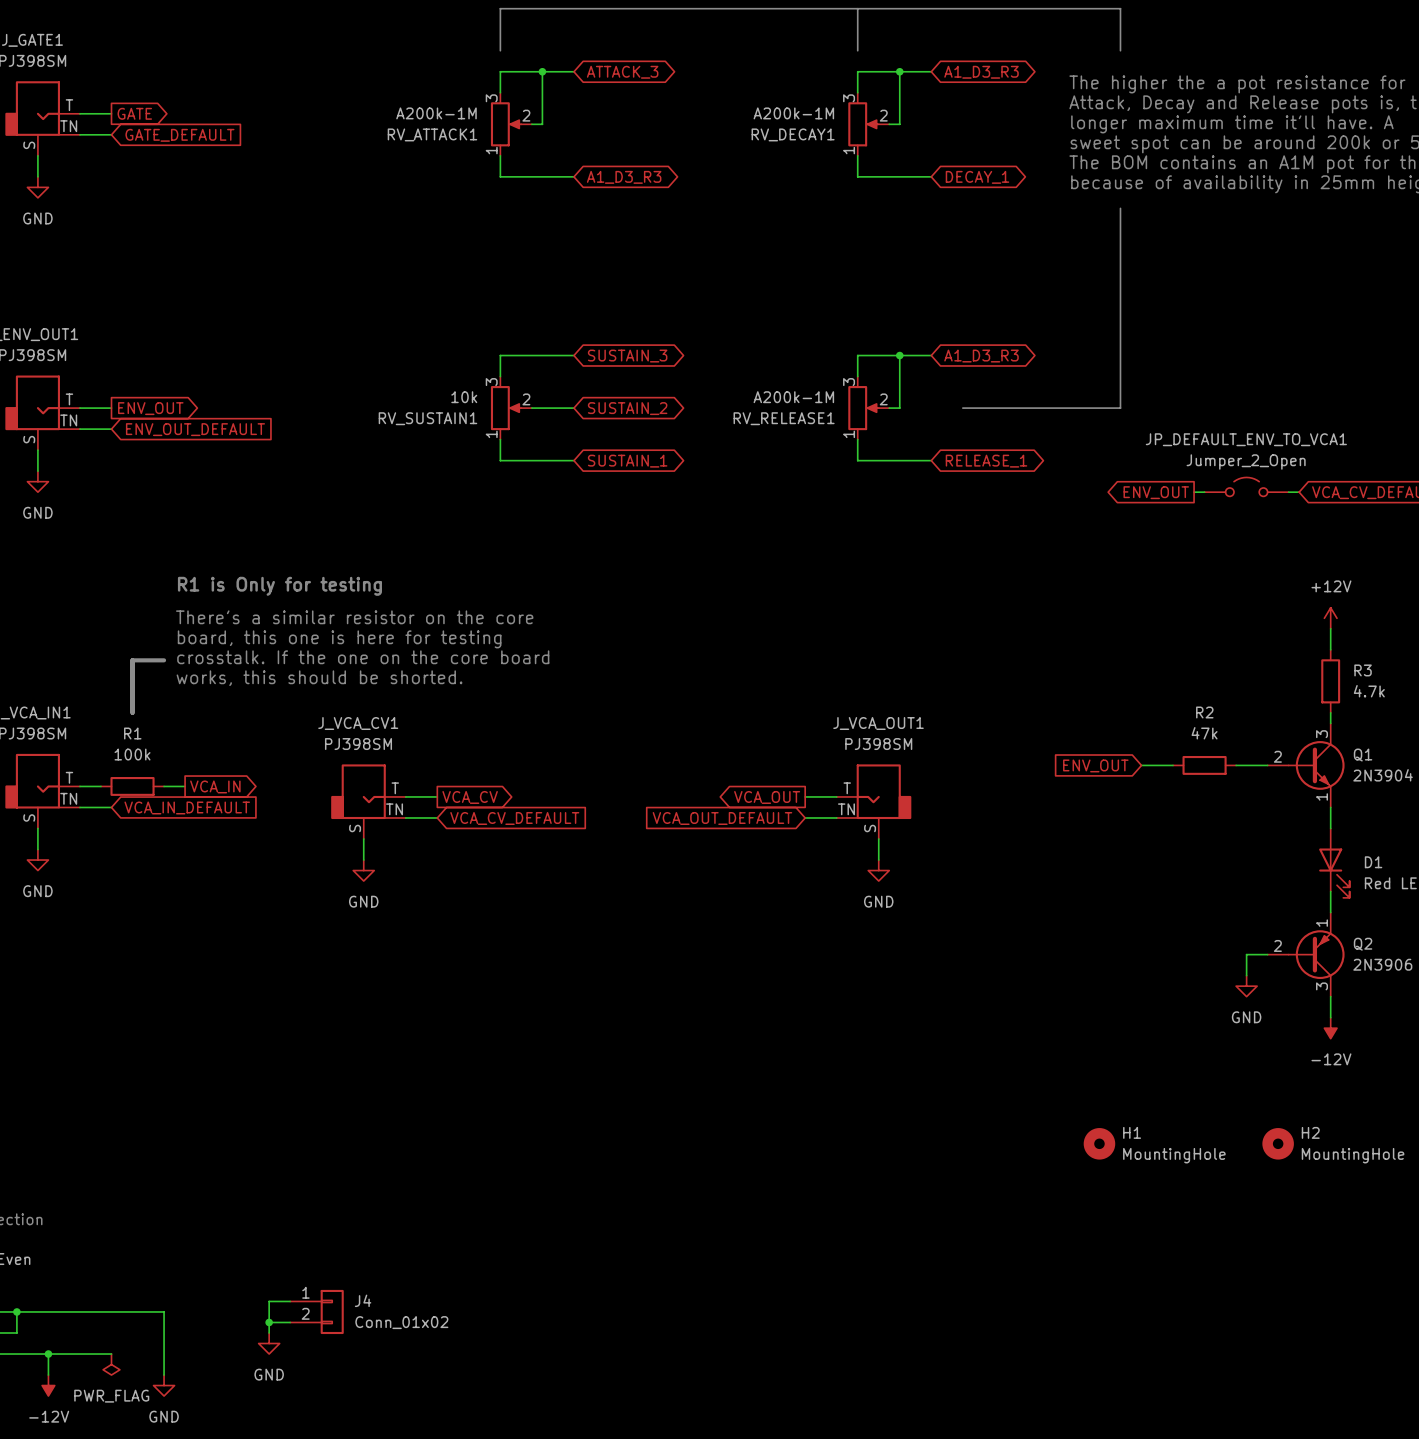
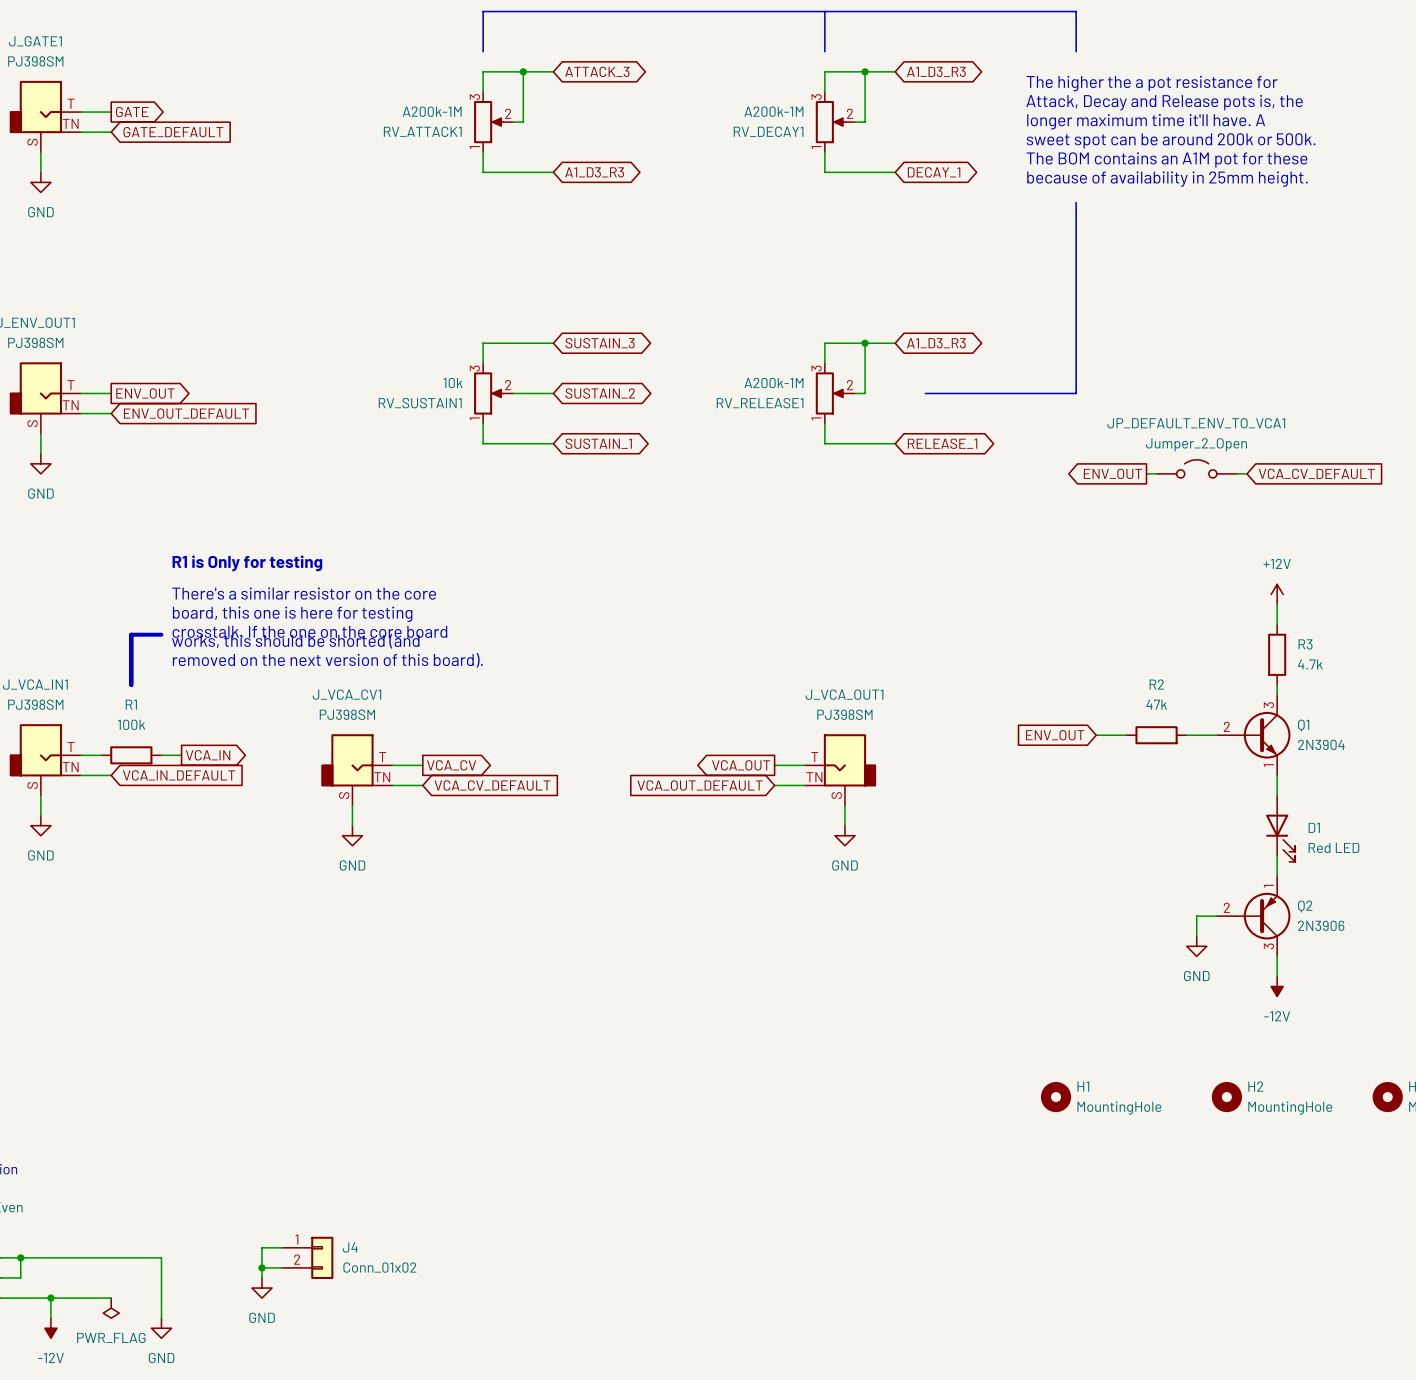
text: works, this should be shorted. (319, 678) -> works, this should be shorted (and (295, 641)
text: none -> removed on the next version of this board). (327, 660)

